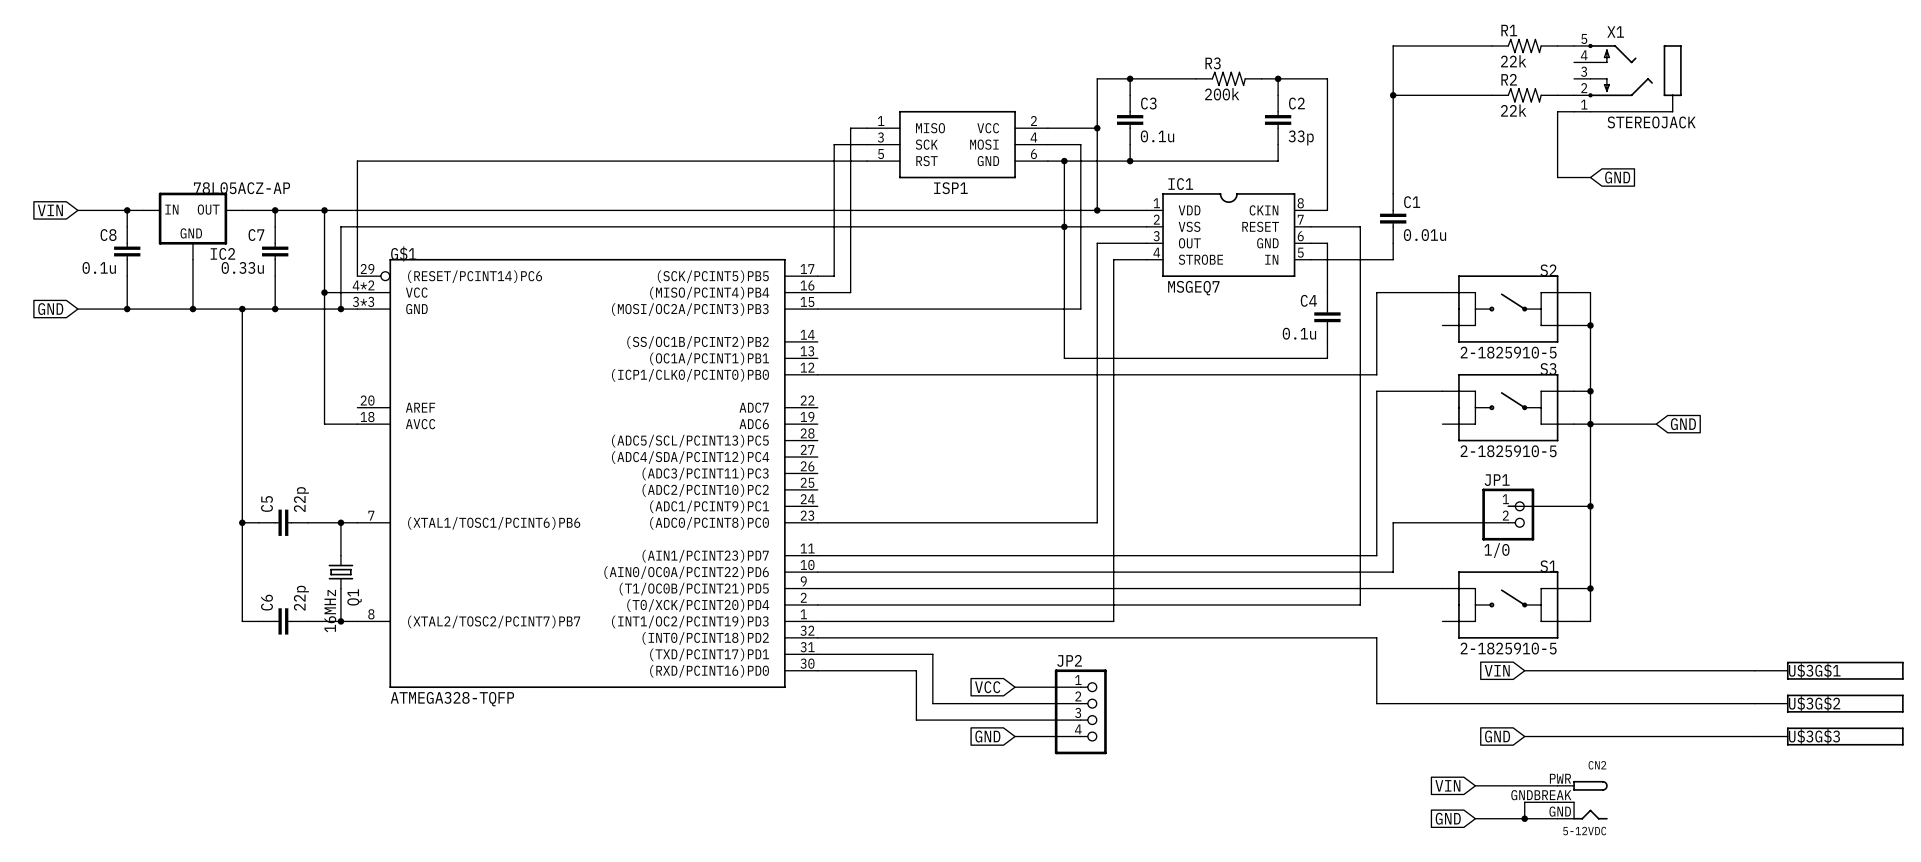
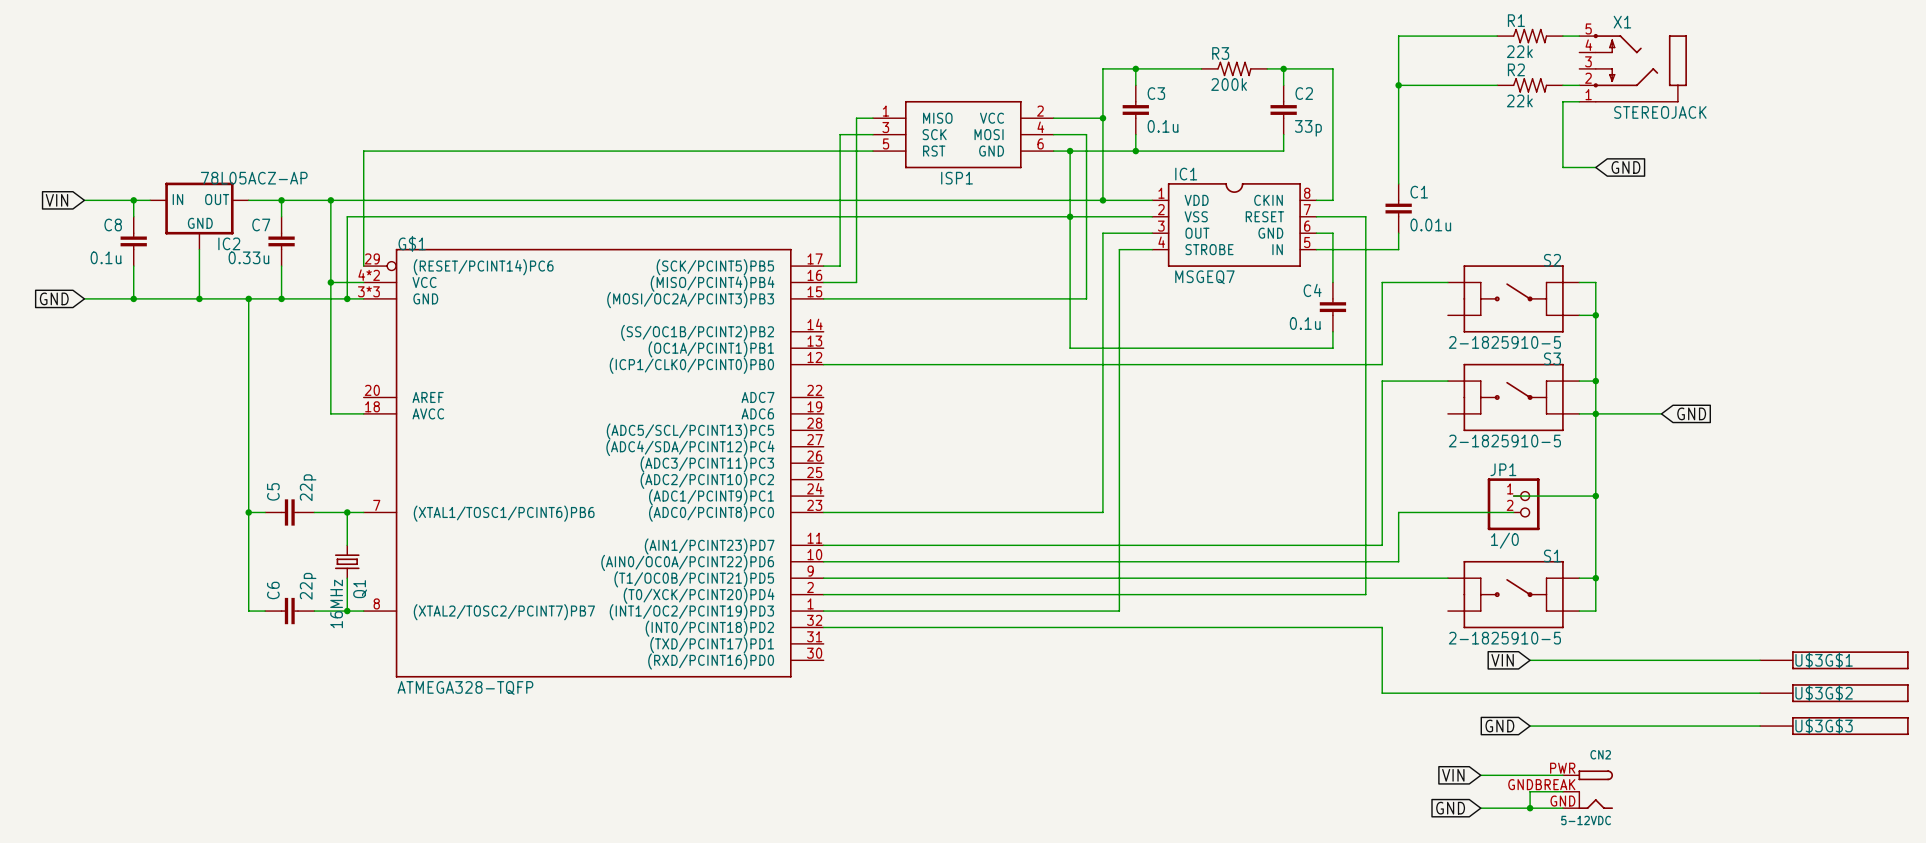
wire: (817, 654) (932, 654) (932, 703) (1080, 703) -> none
wire: (817, 670) (916, 670) (916, 720) (1080, 720) -> none
global label: VCC (987, 687) -> none
wire: (1015, 687) (1080, 687) -> none
JP2: (1080, 711) -> none
global label: GND (987, 736) -> none
wire: (1015, 736) (1080, 736) -> none

